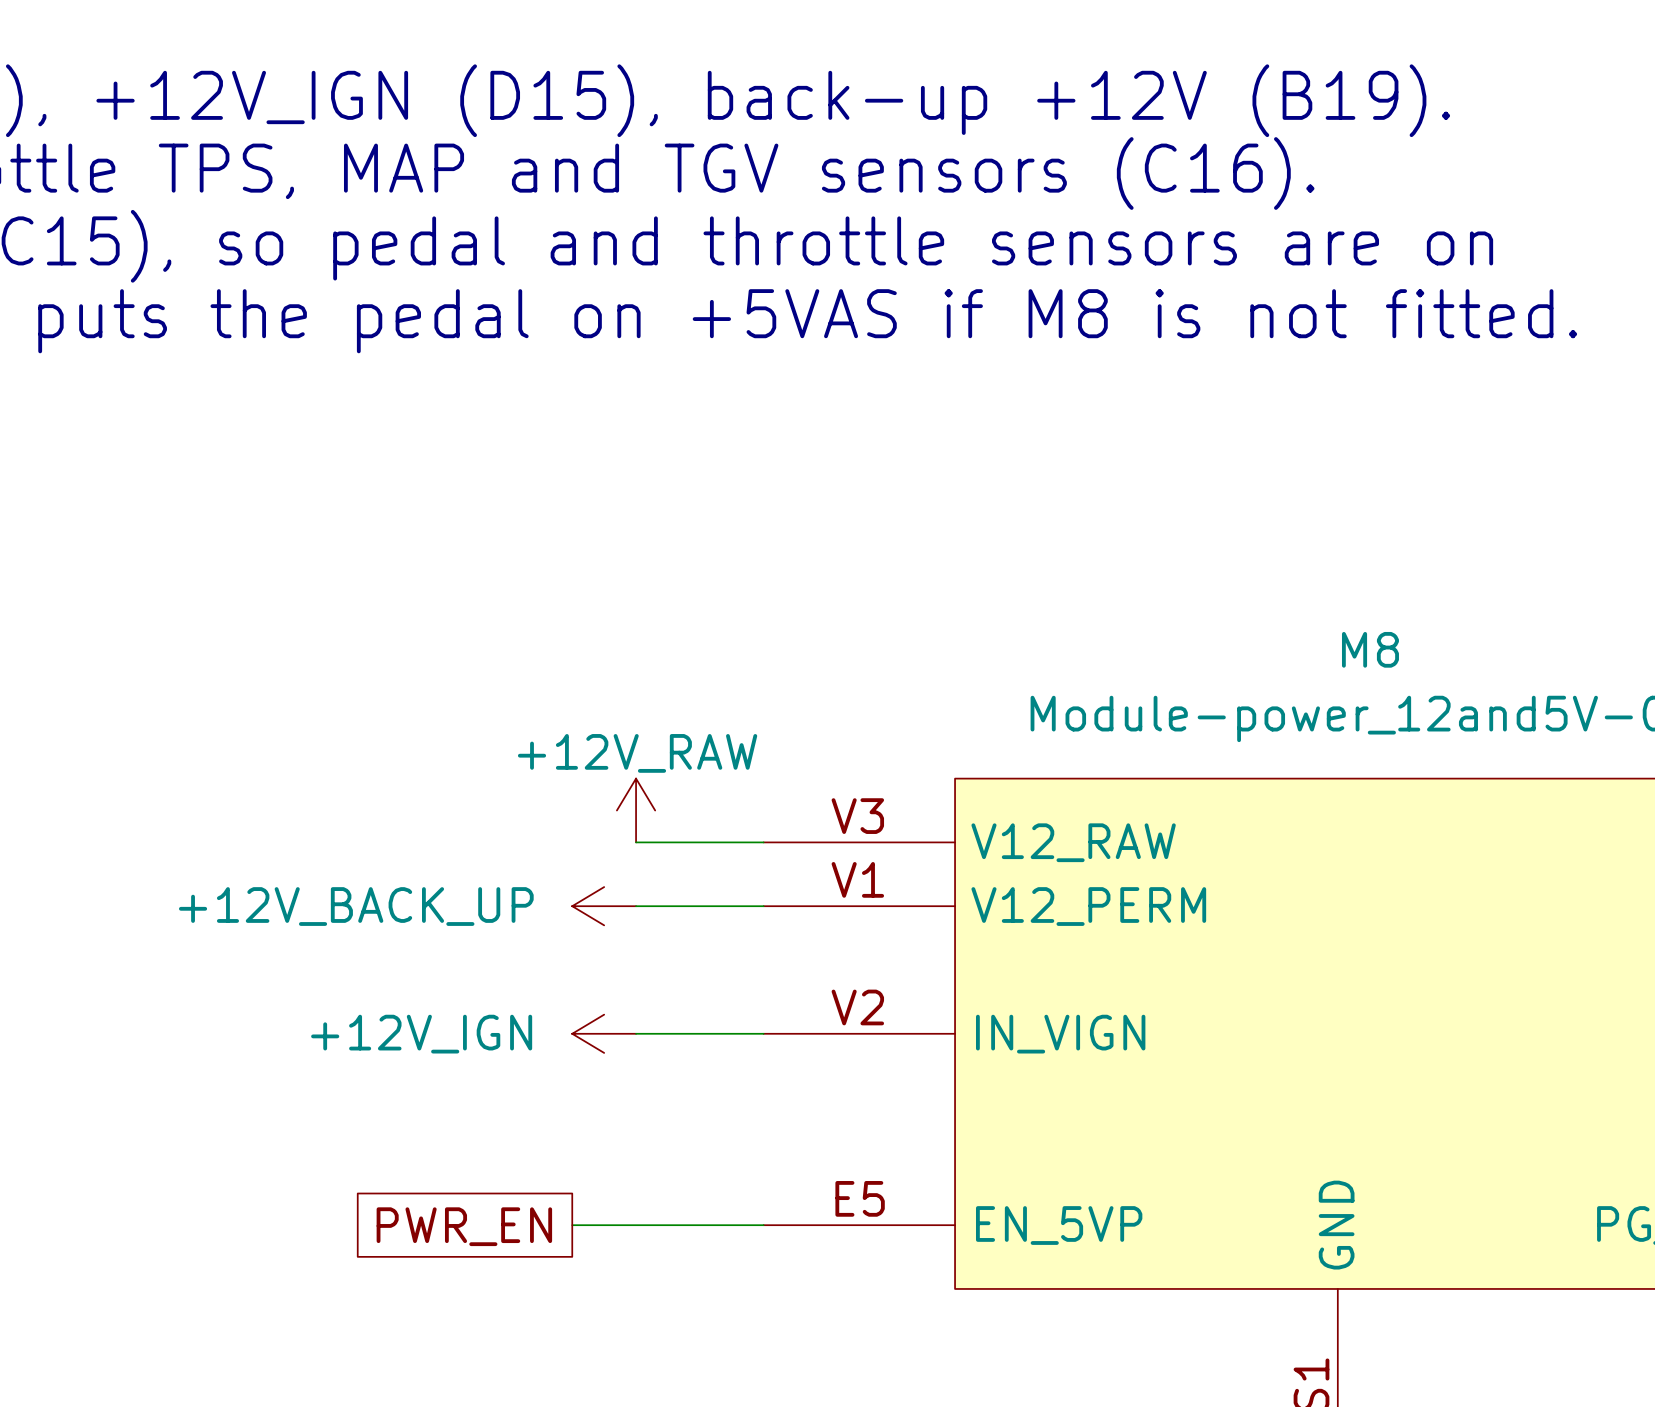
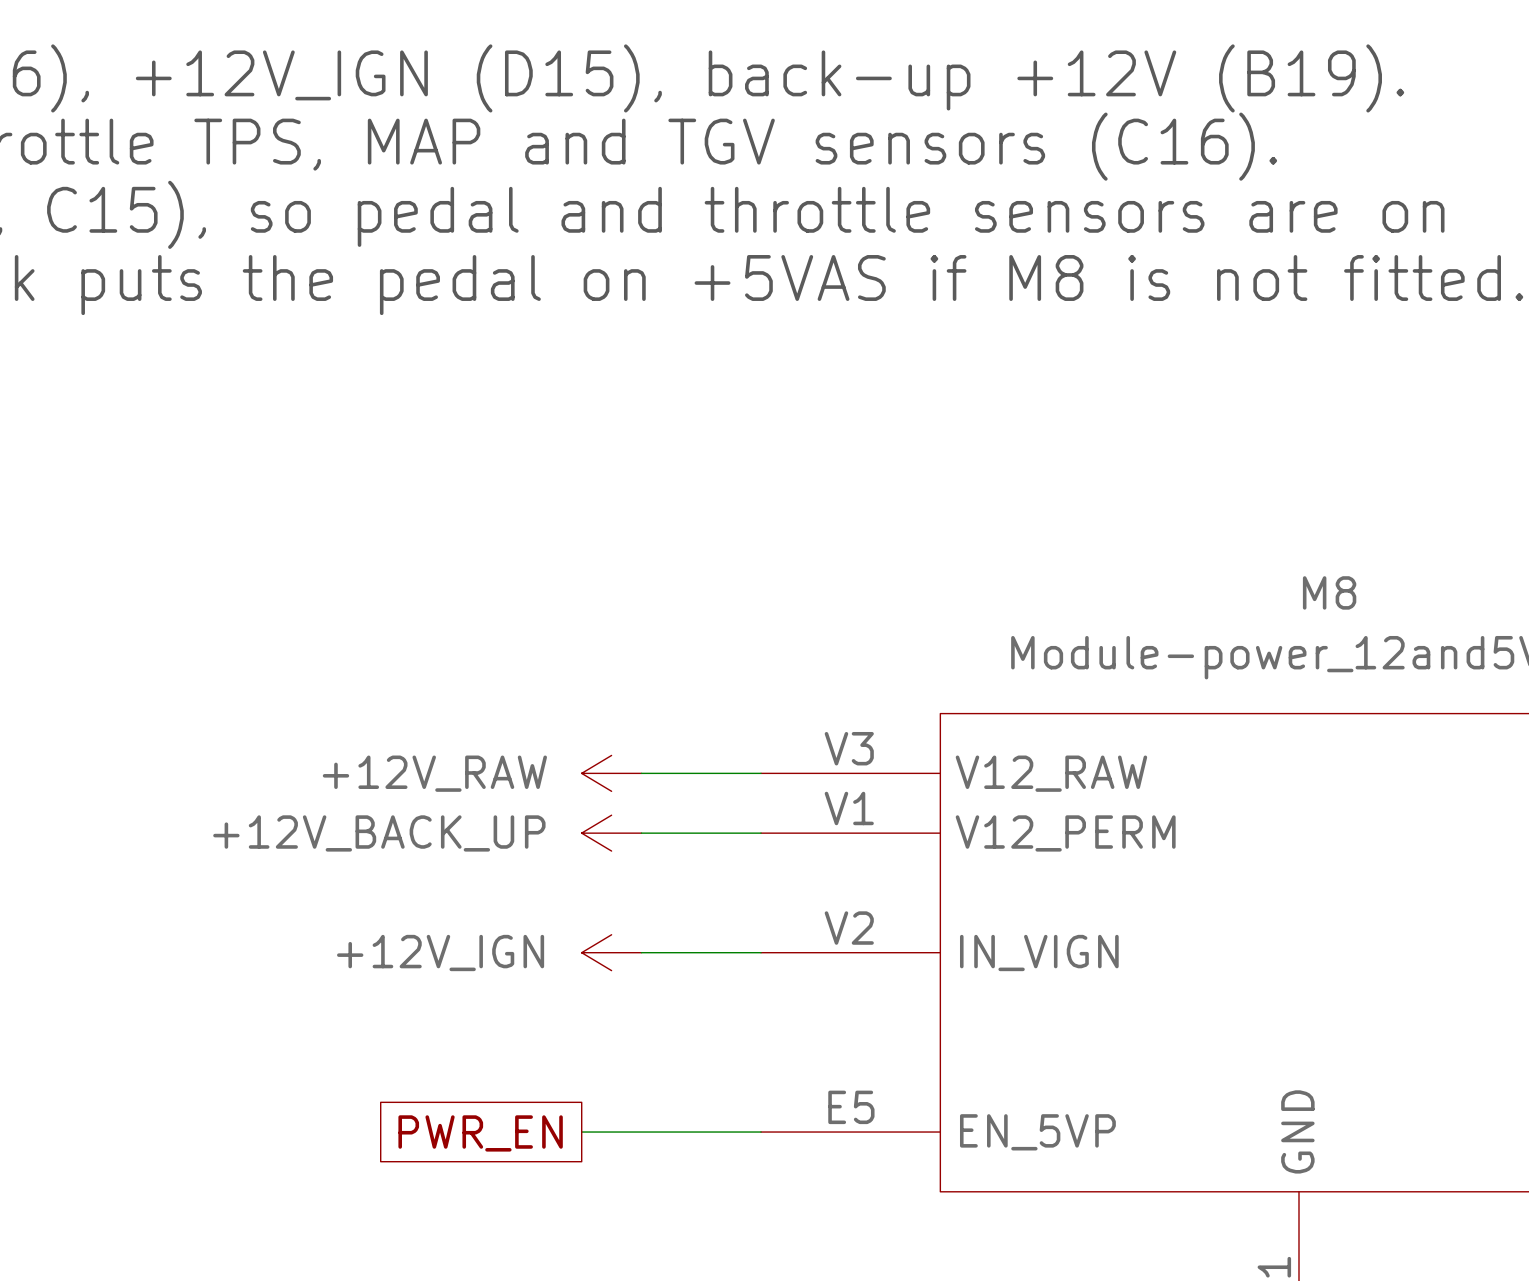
power symbol text position: +12V_RAW (637, 753) -> +12V_RAW (434, 773)
power symbol rotation: 0° (636, 810) -> 90° counterclockwise (611, 773)
power symbol position: +12V_RAW (636, 810) -> +12V_RAW (611, 773)

